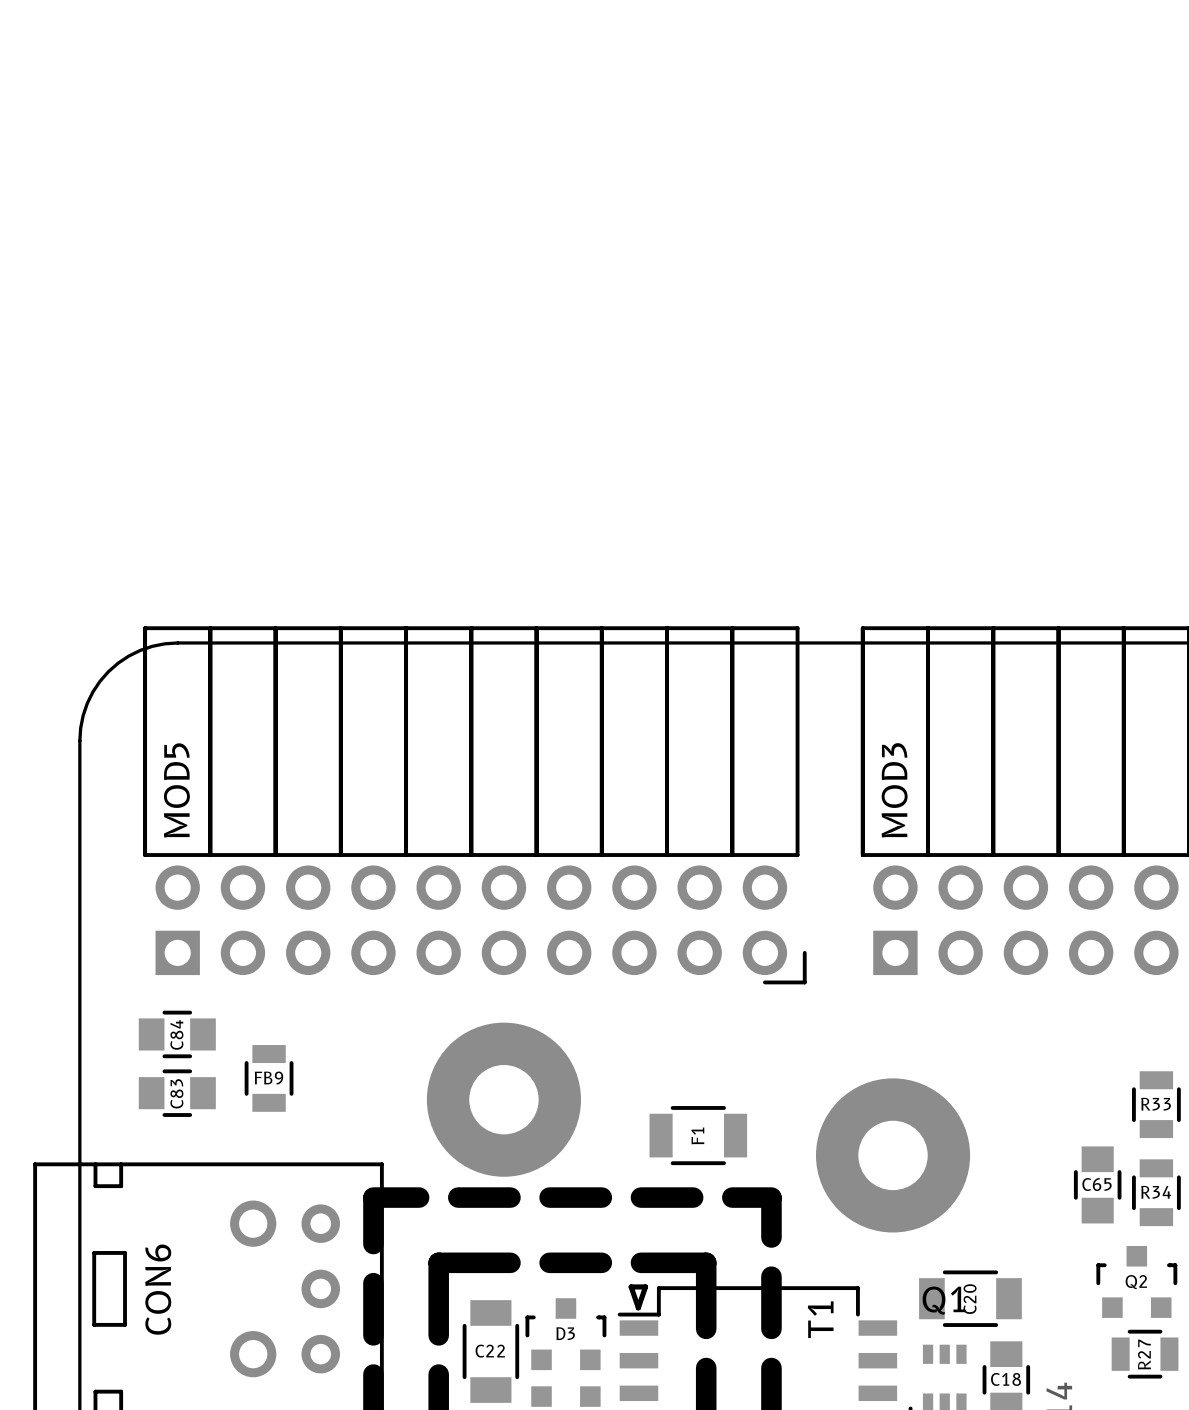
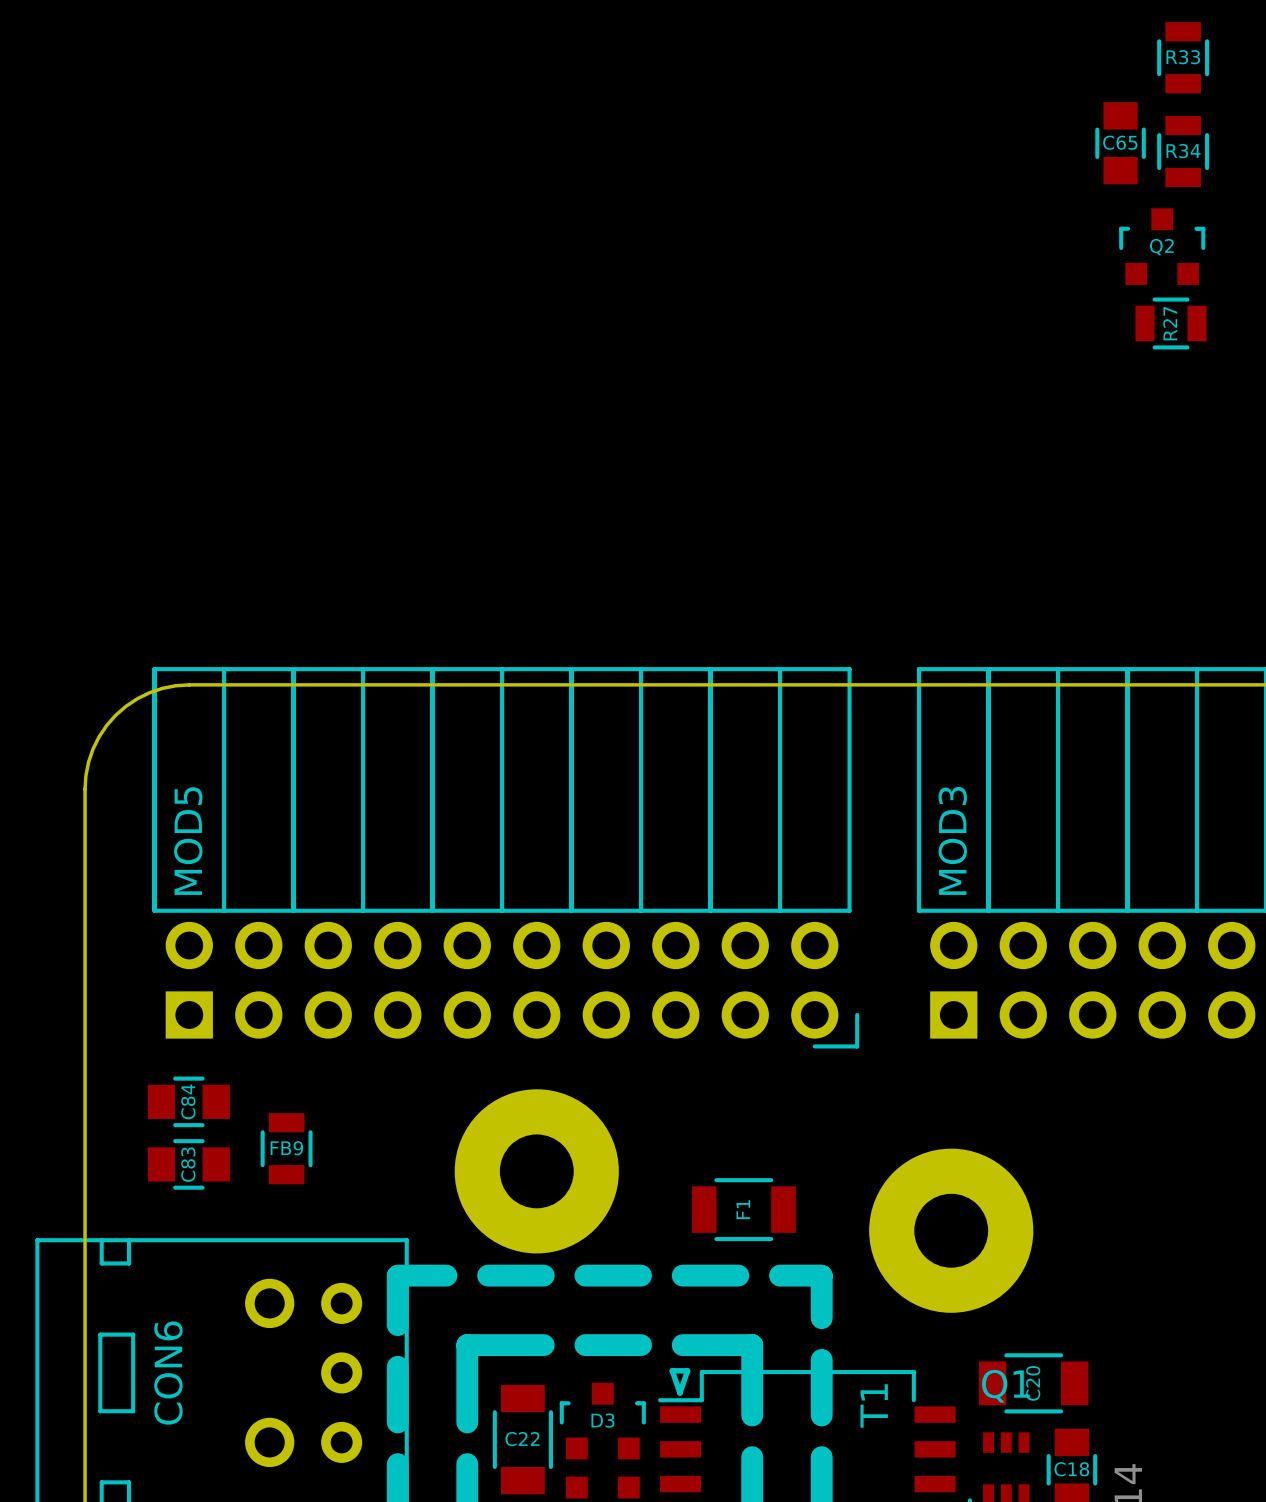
R33 position: (1156, 1104) -> (1183, 57)
C65 position: (1097, 1184) -> (1120, 143)
R34 position: (1156, 1192) -> (1183, 151)
Q2 position: (1136, 1281) -> (1162, 246)
R27 position: (1145, 1354) -> (1171, 323)

